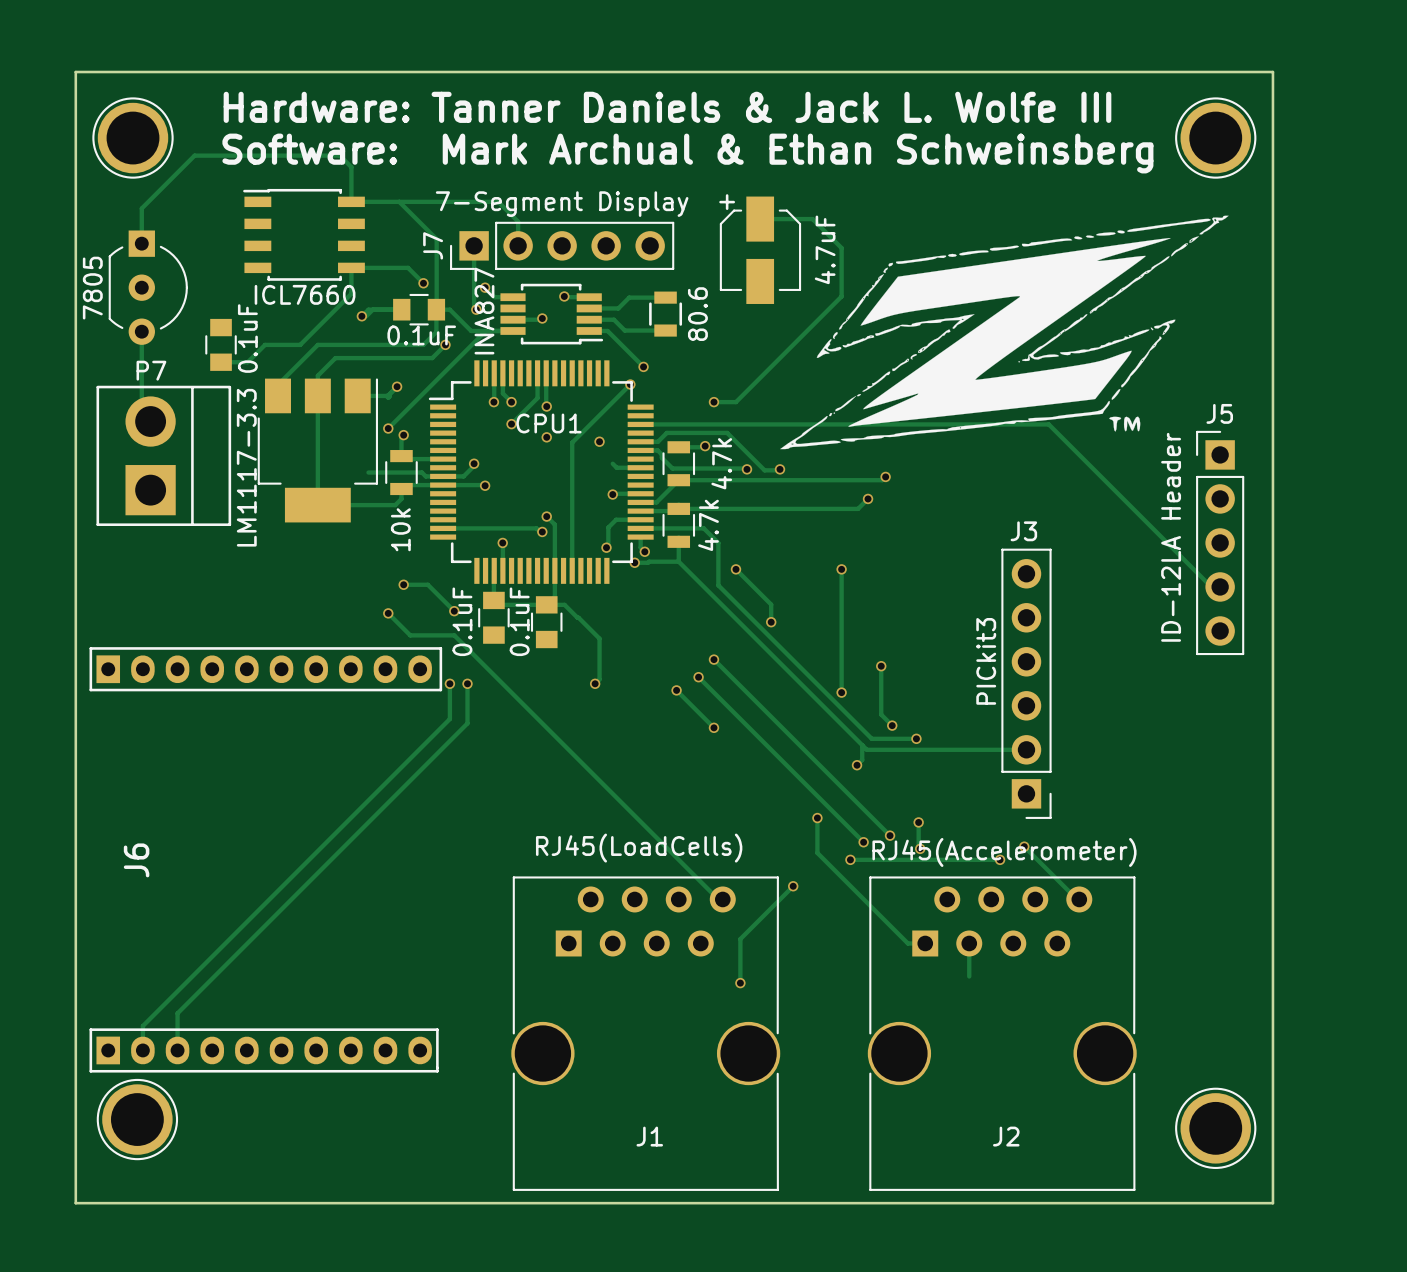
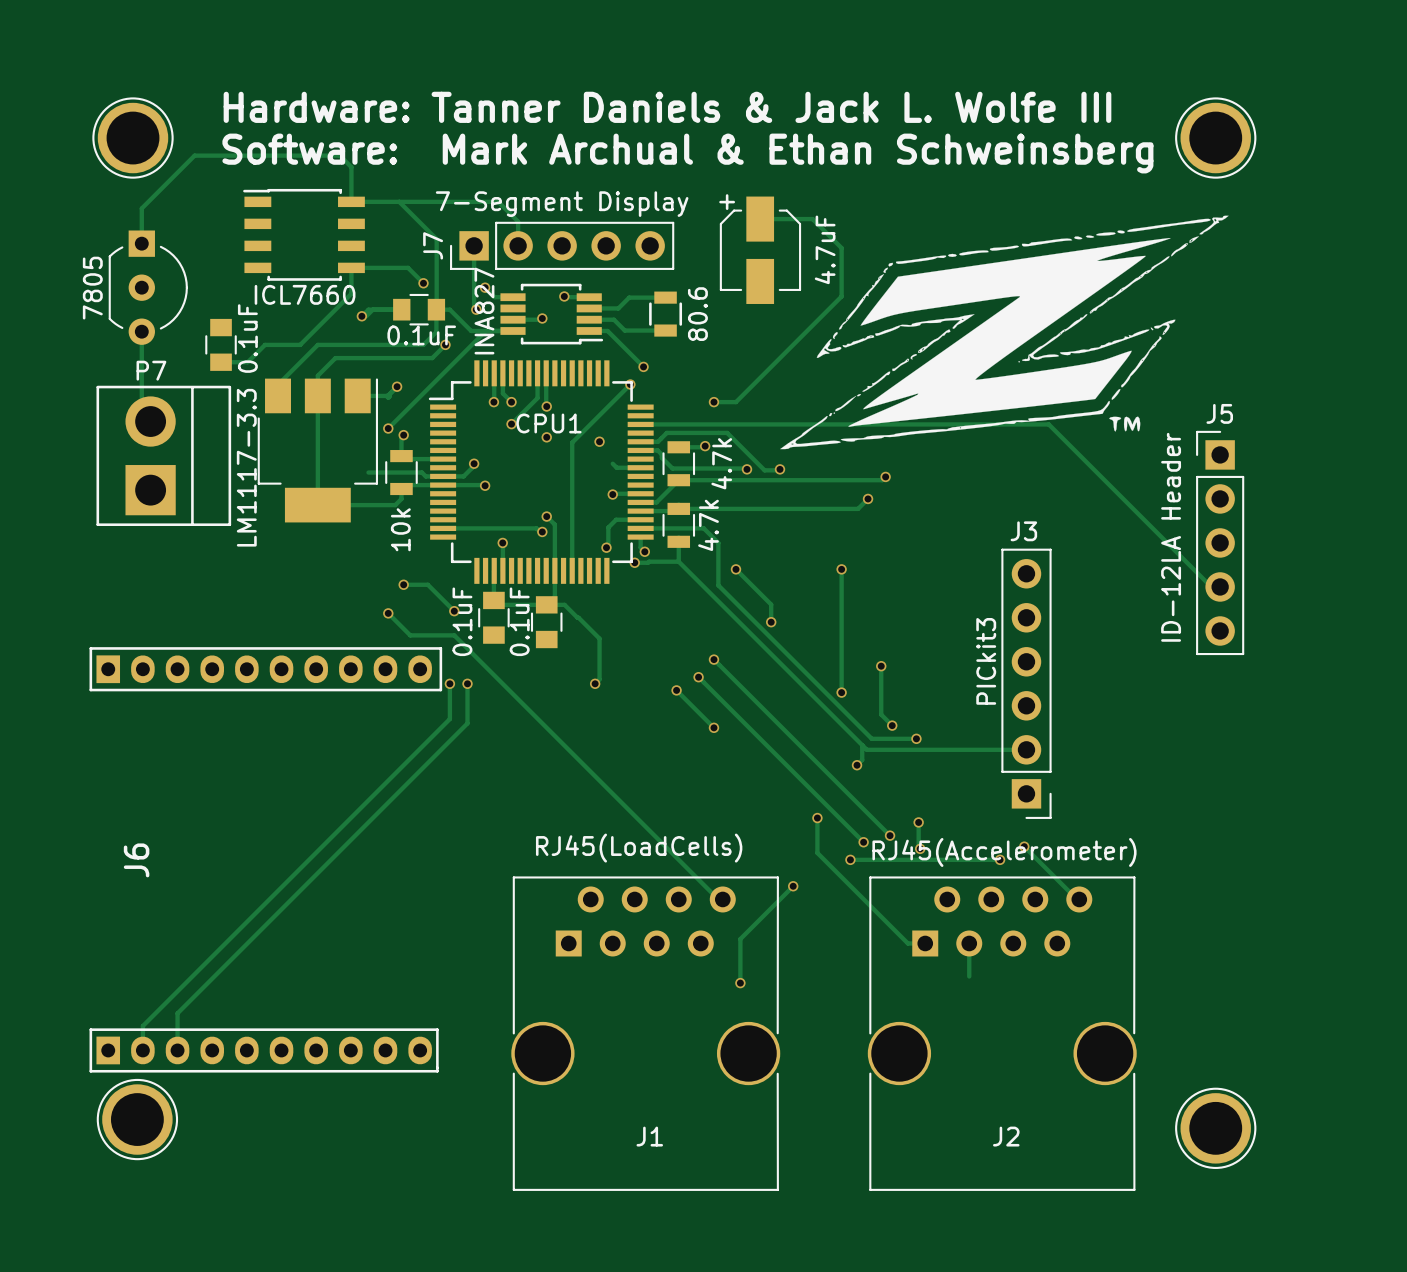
board edge: (75, 72) (75, 1203) (1272, 1203) (1272, 72) (75, 72) -> none

